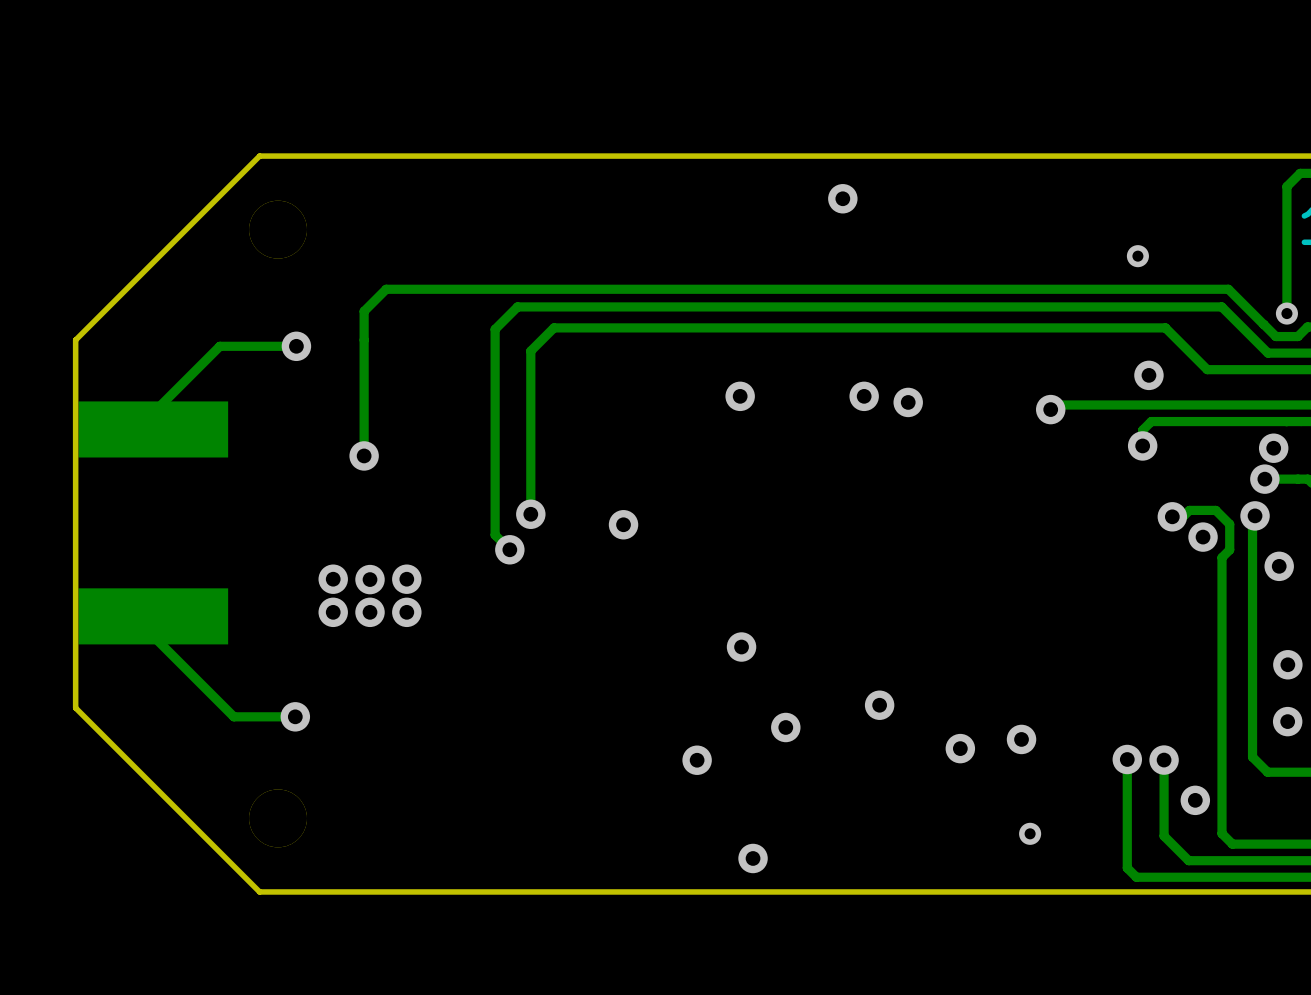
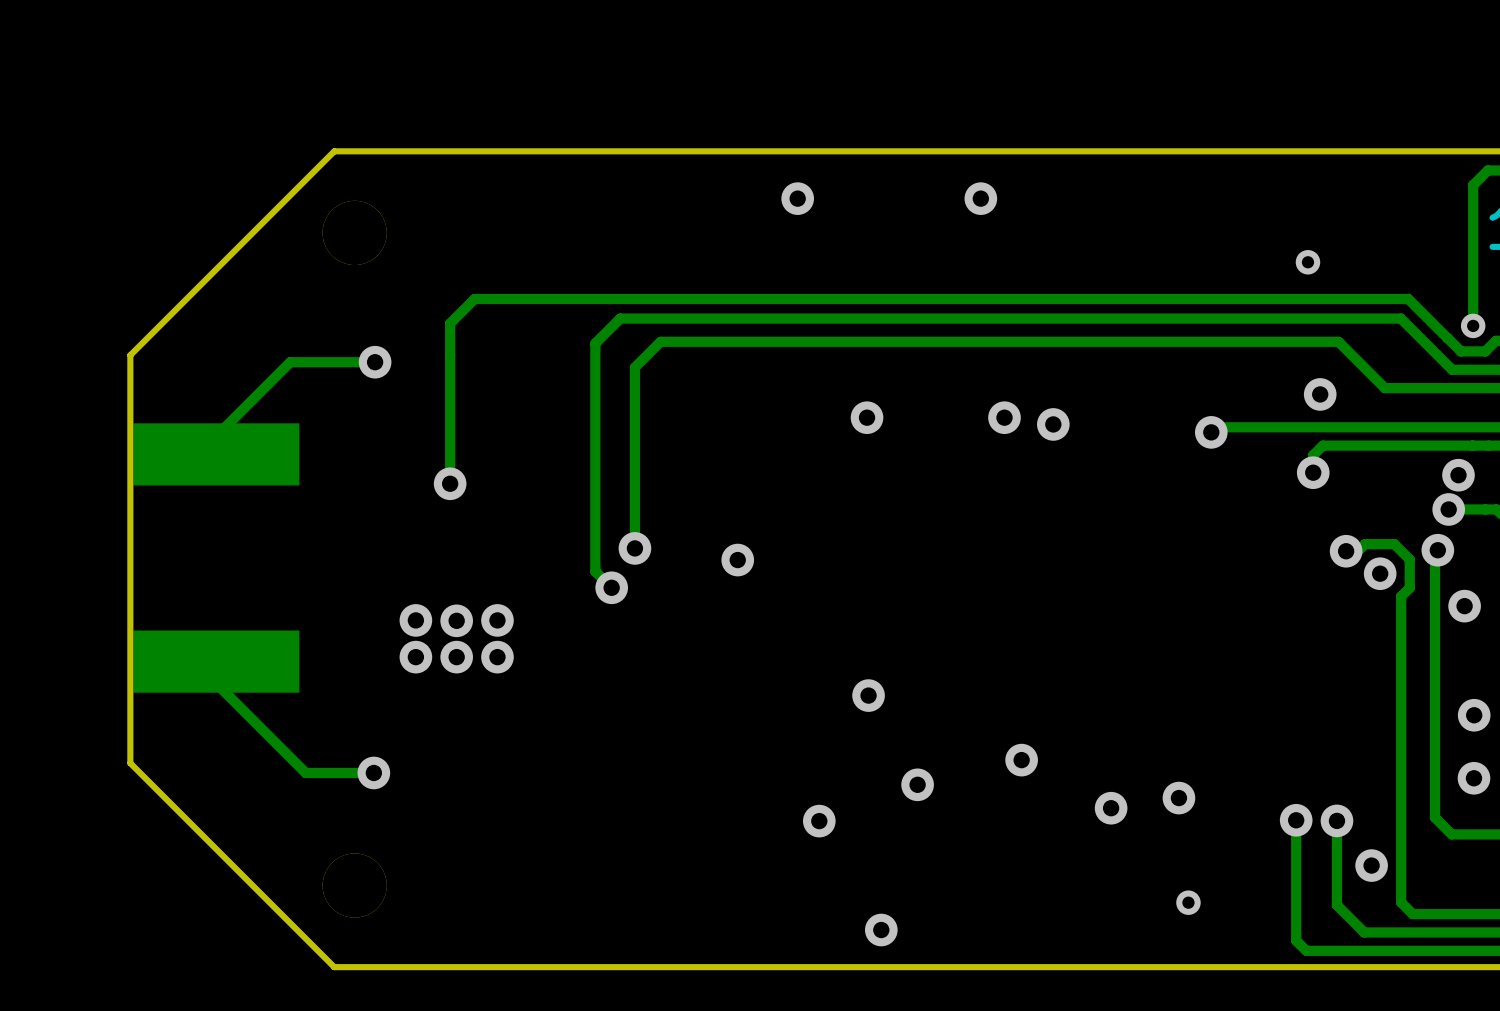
via: none -> (797, 198)

